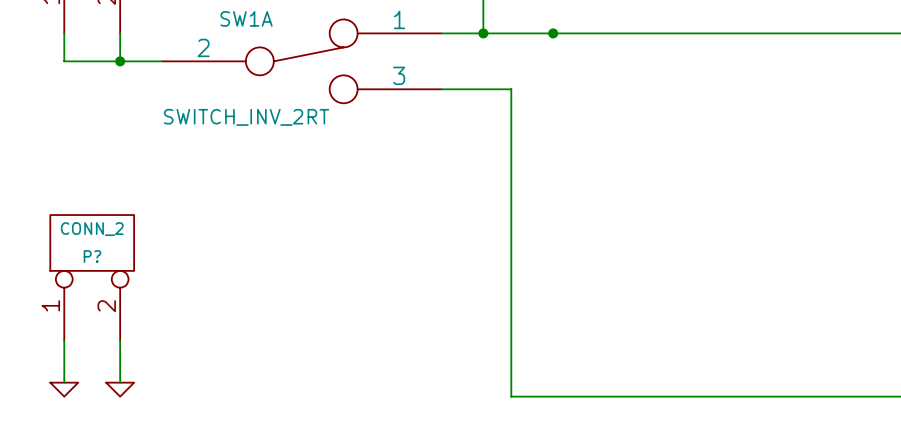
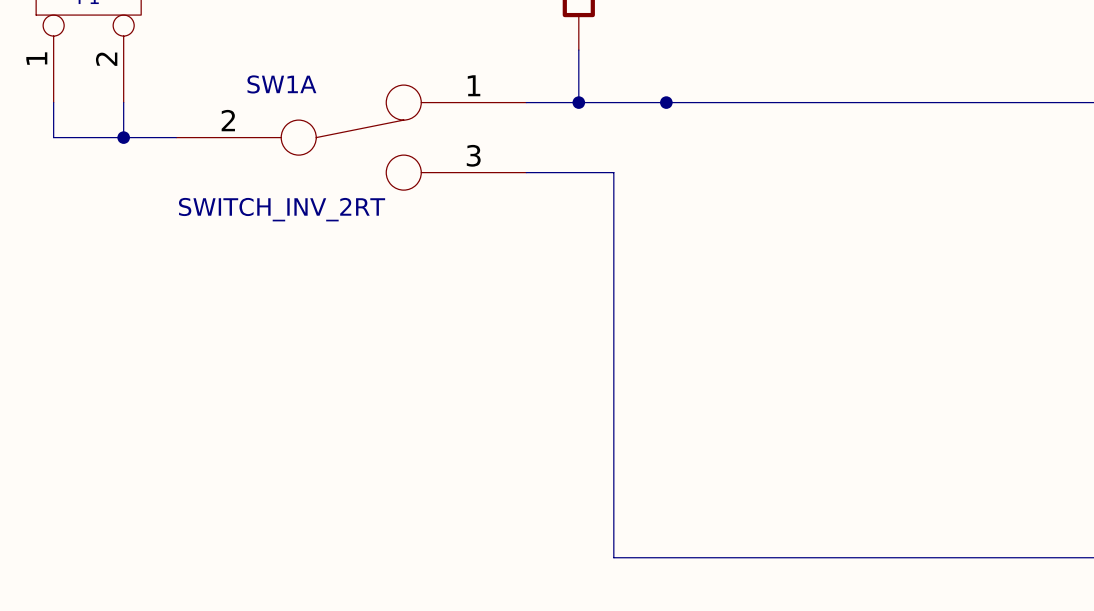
P?: CONN_2 (92, 277) -> none
wire: (64, 340) (64, 382) -> none
wire: (120, 340) (120, 382) -> none
power symbol: (64, 389) -> none
power symbol: (120, 389) -> none

